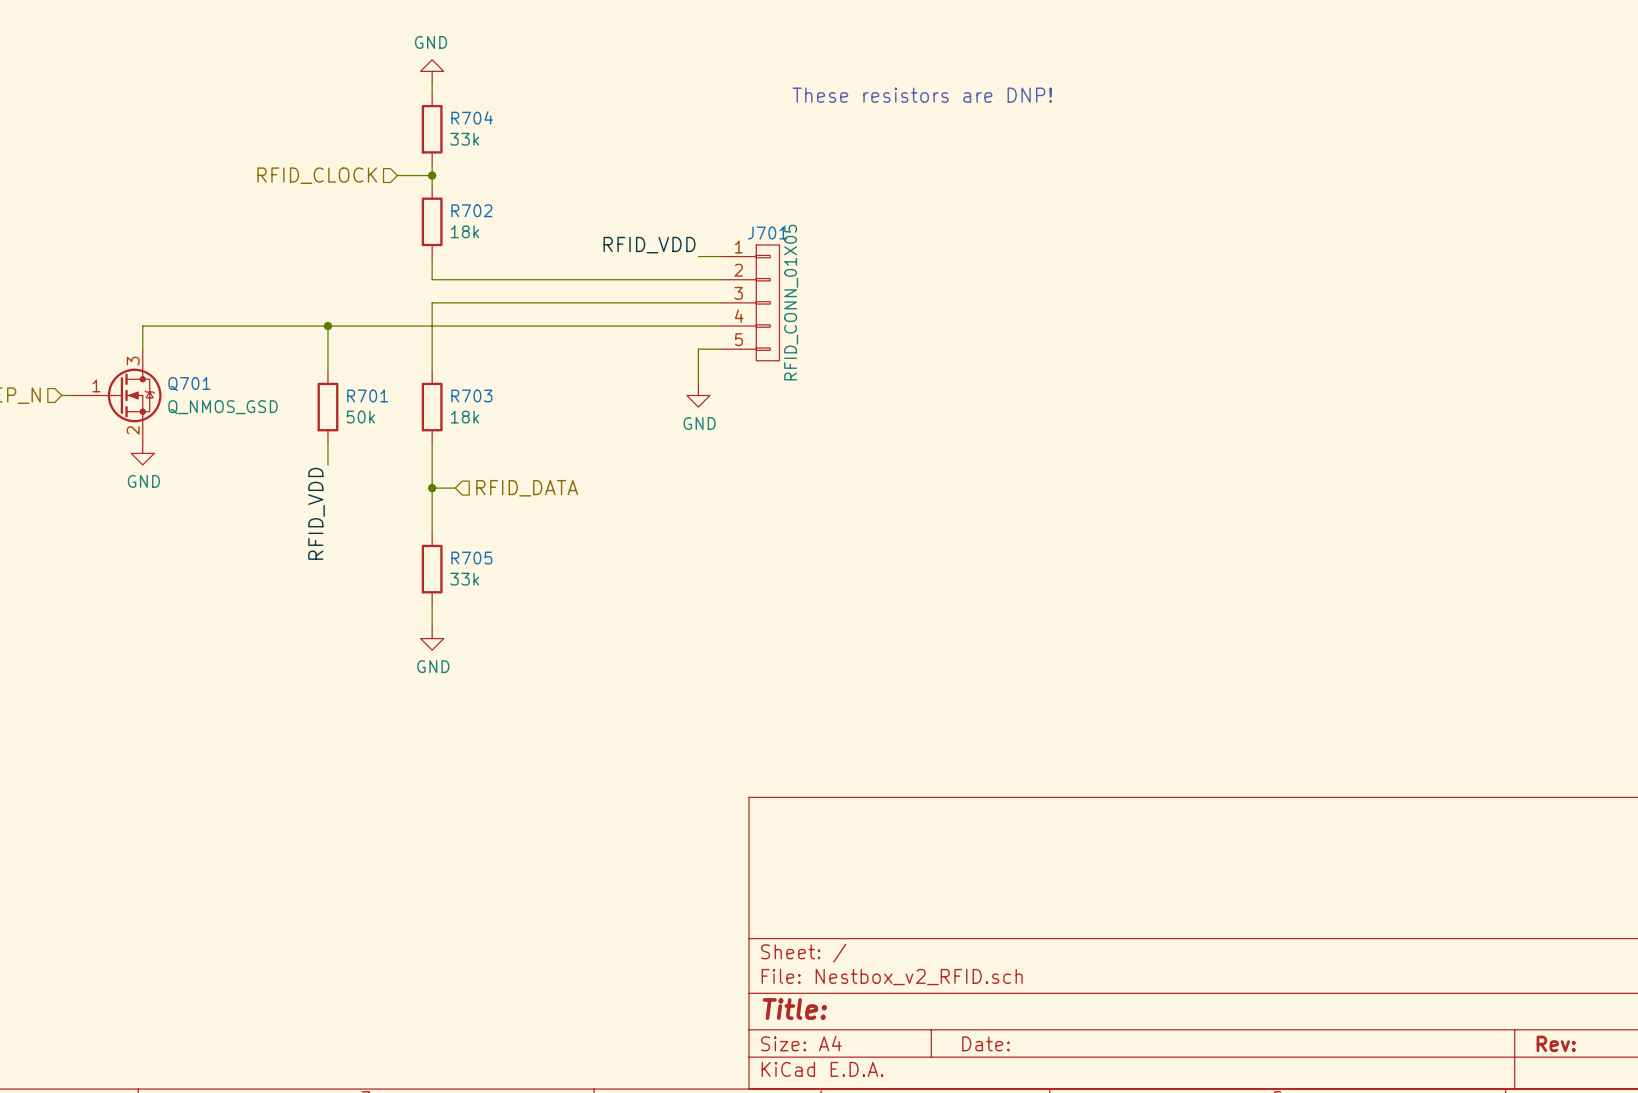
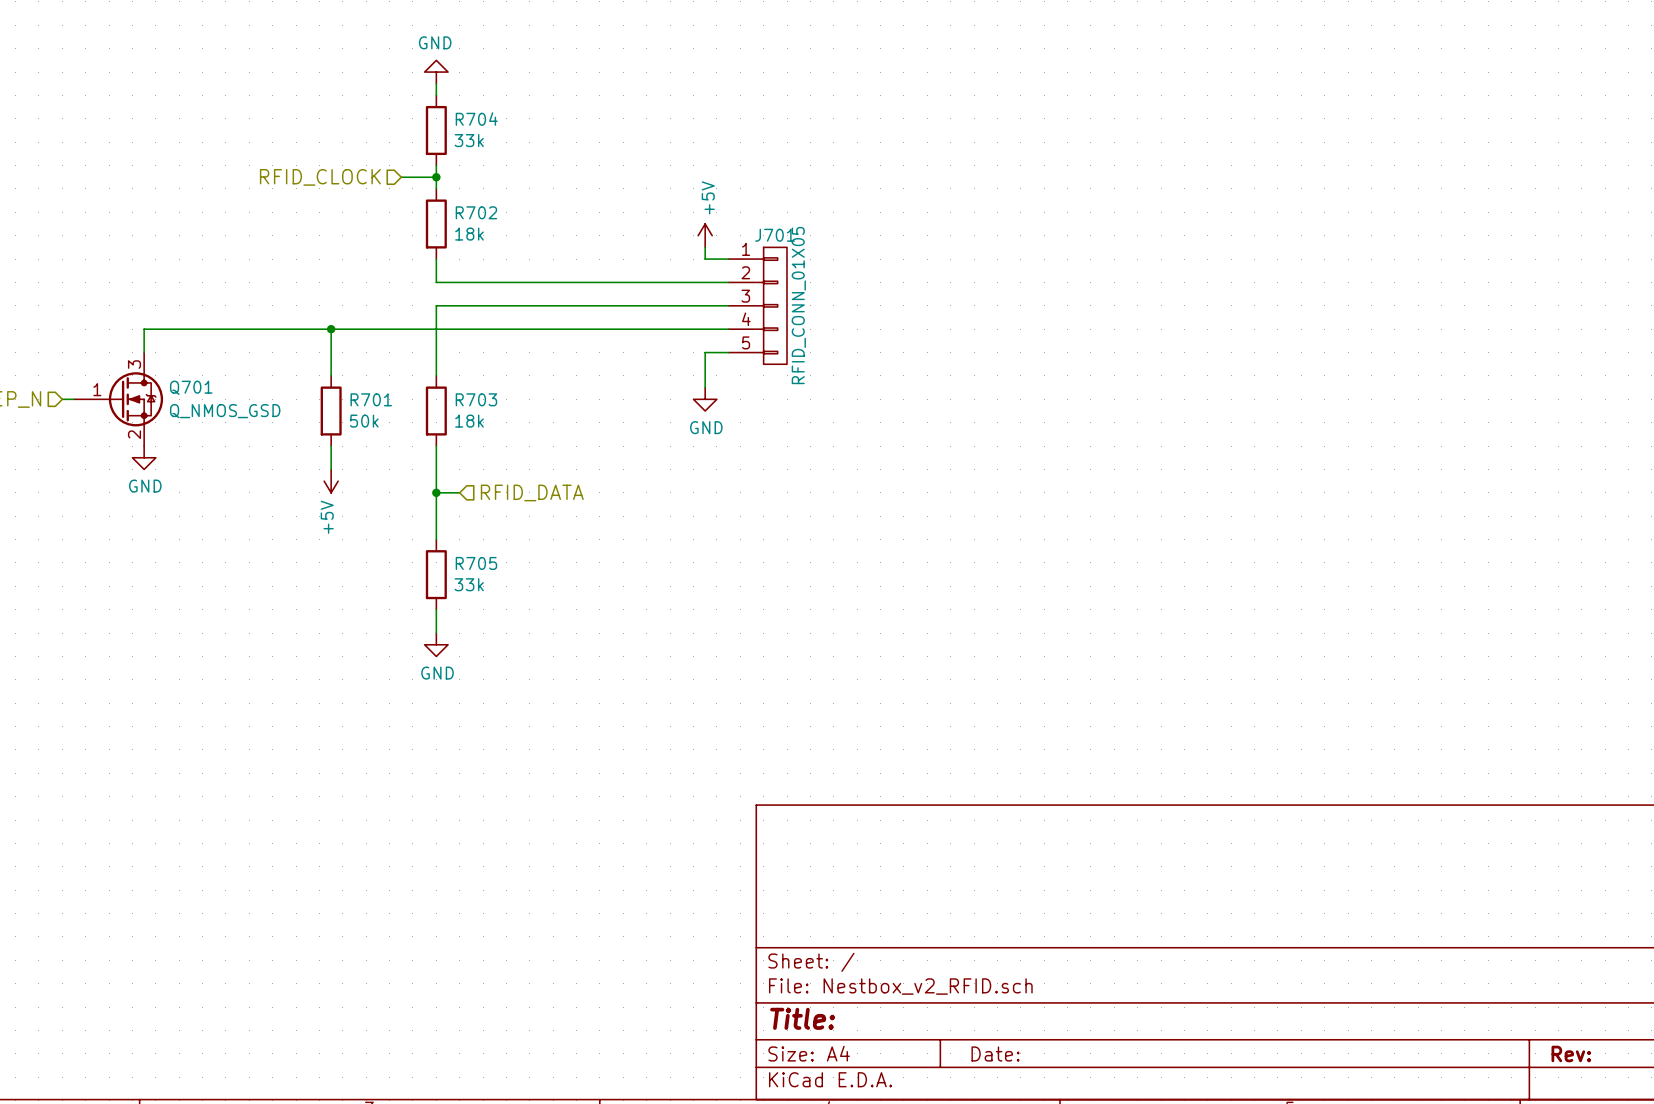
text: These resistors are DNP! (922, 95) -> none
power symbol: none -> +5V (705, 235)
label: RFID_VDD (649, 245) -> none
wire: none -> (705, 247) (705, 259)
power symbol: none -> +5V (331, 481)
label: RFID_VDD (316, 513) -> none

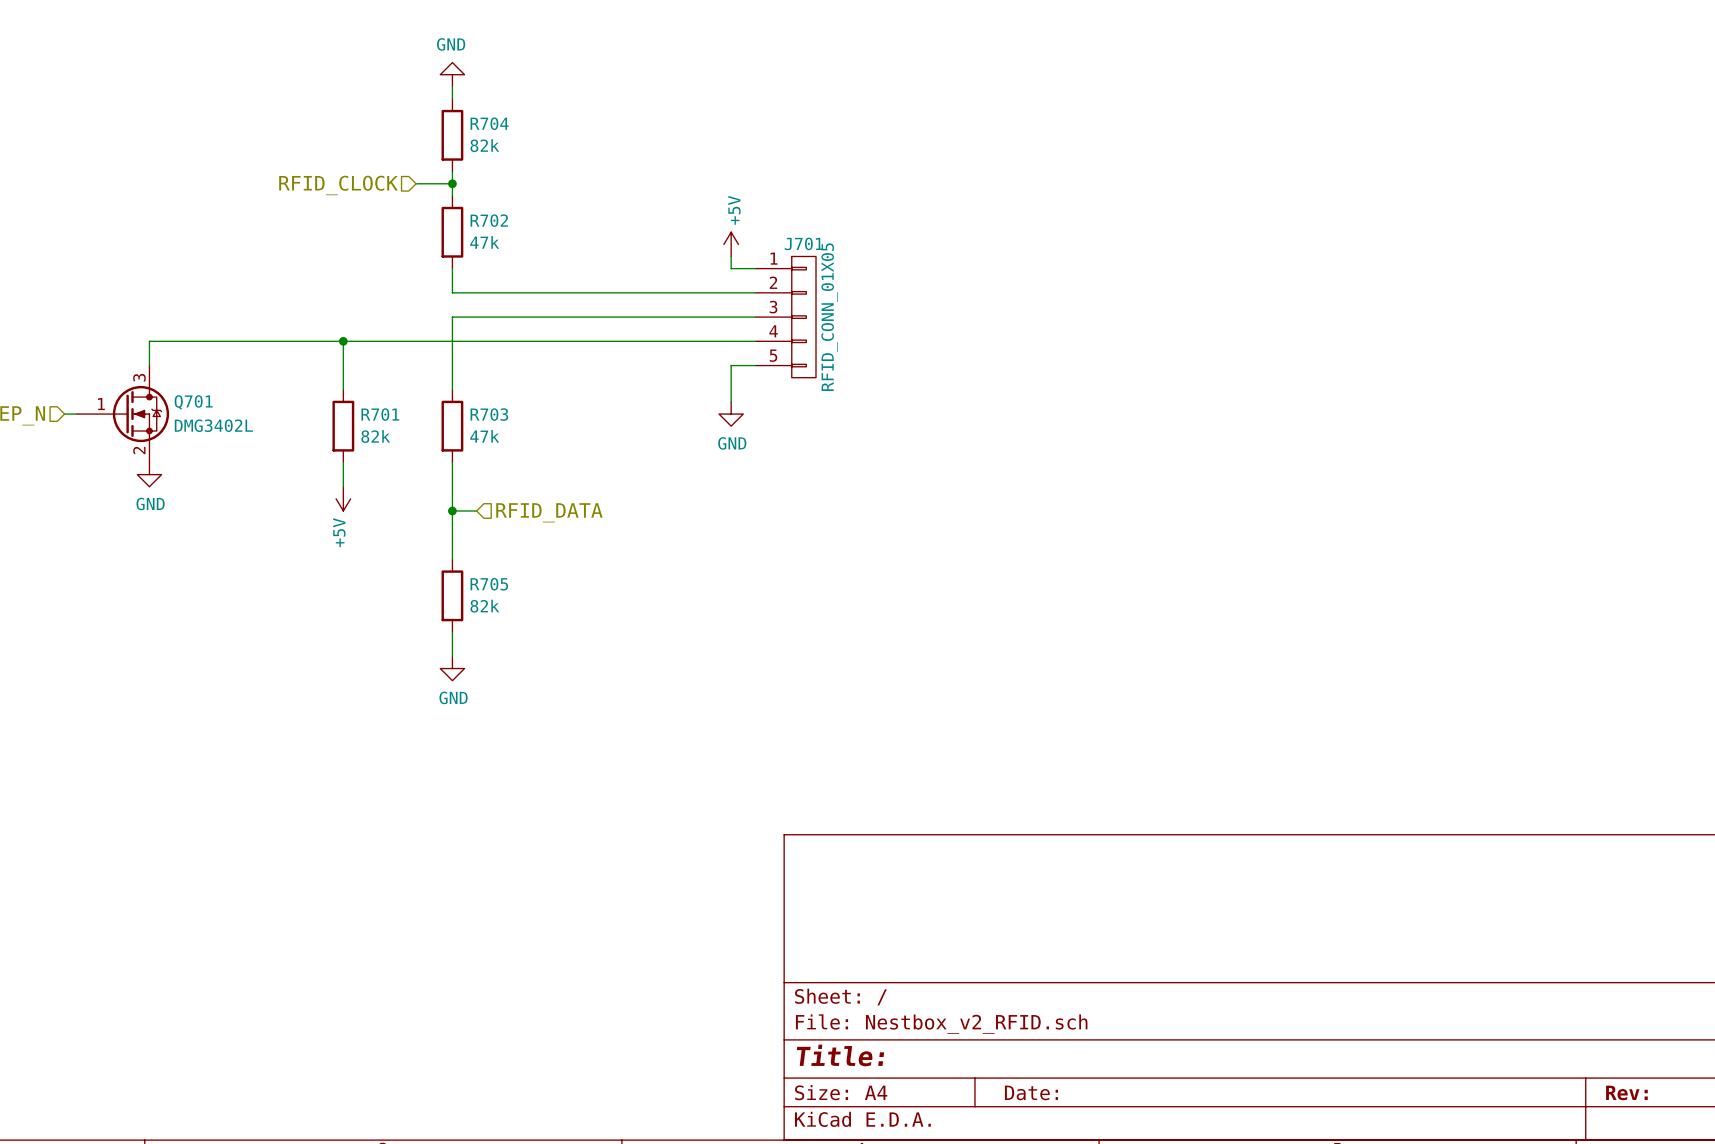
R704 value: 33k (469, 140) -> 82k (484, 145)
R702 value: 18k (469, 234) -> 47k (484, 242)
Q701 value: Q_NMOS_GSD (225, 411) -> DMG3402L (213, 425)
R701 value: 50k (364, 421) -> 82k (375, 436)
R703 value: 18k (469, 421) -> 47k (484, 436)
R705 value: 33k (469, 584) -> 82k (484, 606)

